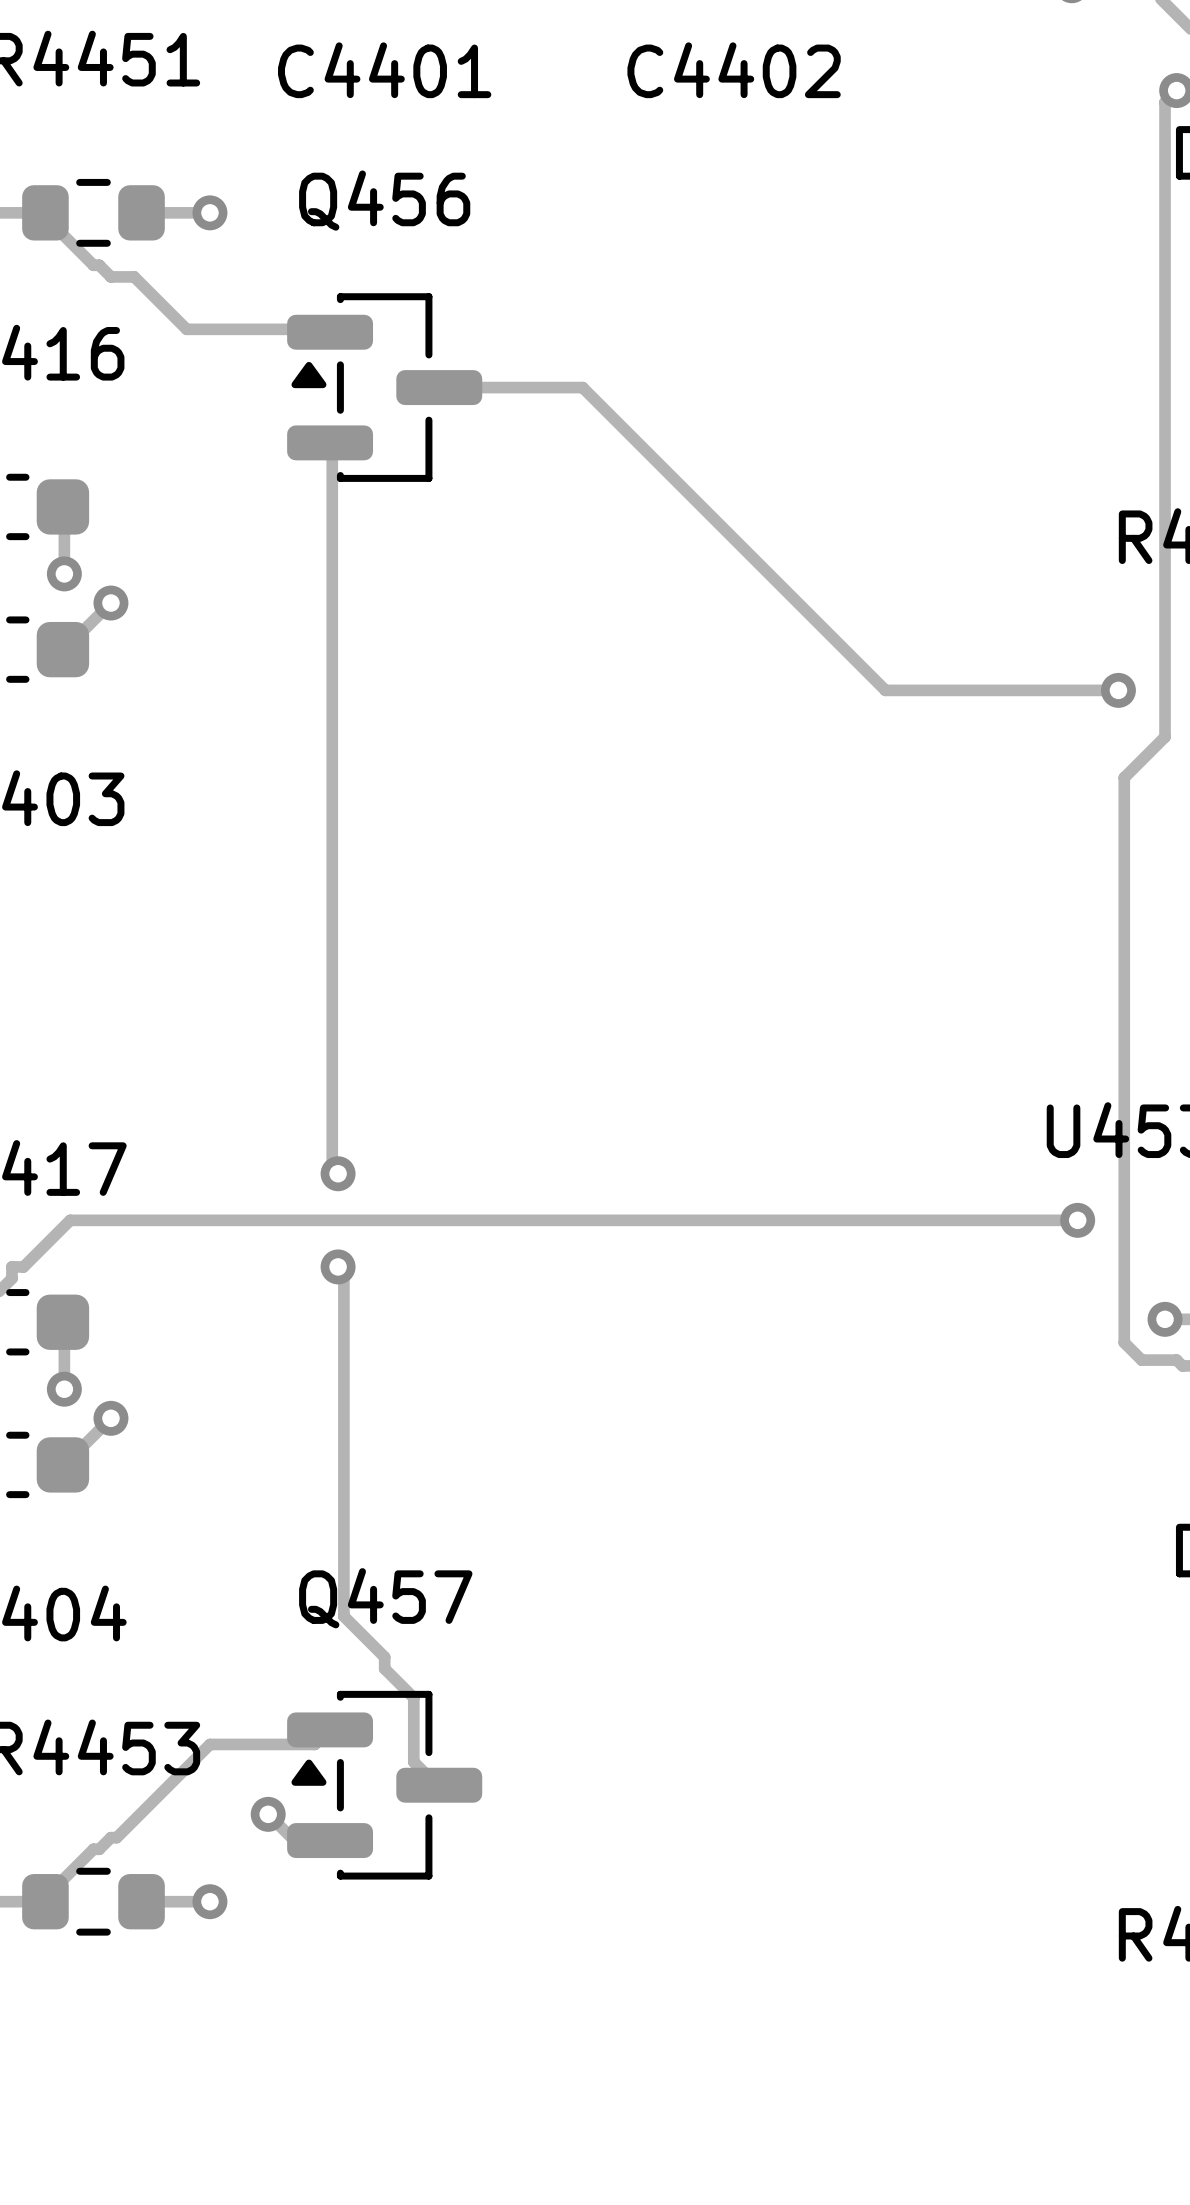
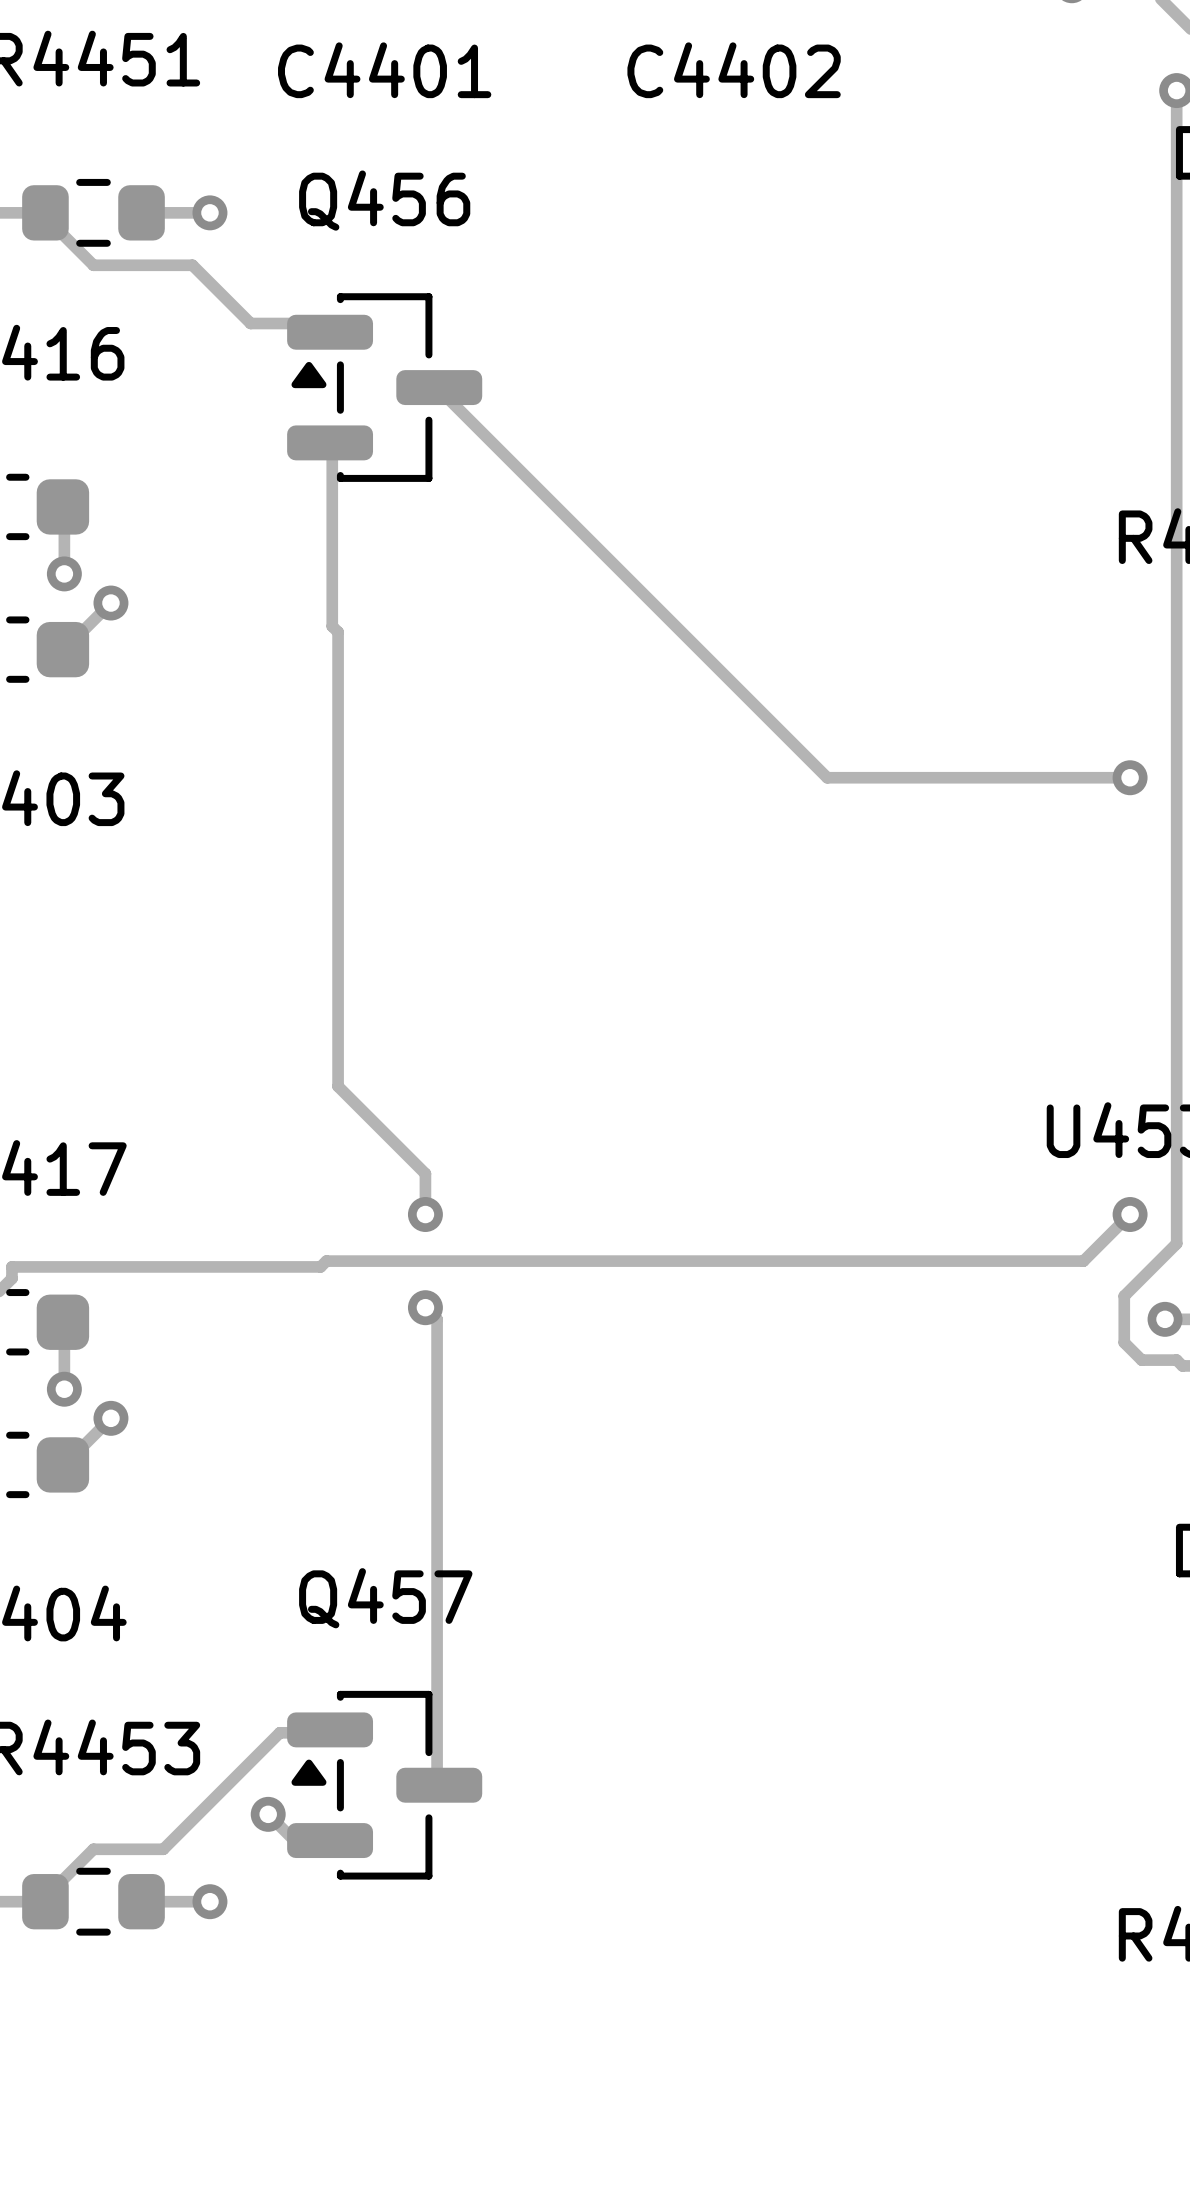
track: (1176, 90) (1165, 102) (1165, 736) (1124, 777) (1124, 1296) -> (1176, 90) (1176, 1243) (1124, 1296)
track: (99, 265) (110, 276) (134, 276) (186, 329) (332, 329) -> (99, 265) (192, 265) (250, 323) (326, 323) (332, 329)
track: (439, 387) (582, 387) (885, 690) (1118, 690) -> (437, 387) (827, 777) (1130, 777)
track: (332, 626) (332, 1167) (338, 1173) -> (332, 626) (338, 632) (338, 1086) (425, 1173) (425, 1214)
via position: (1118, 690) -> (1130, 777)
via: (338, 1173) -> none
via: none -> (425, 1214)
track: (1077, 1220) (70, 1220) (23, 1266) -> (1130, 1214) (1083, 1261) (326, 1261) (320, 1266) (23, 1266)
via position: (1077, 1220) -> (1130, 1214)
track: (338, 1266) (343, 1272) (343, 1616) (384, 1657) (384, 1668) (413, 1697) (413, 1761) (437, 1785) -> (425, 1307) (437, 1319) (437, 1785)
via: (338, 1266) -> none
via: none -> (425, 1307)
track: (326, 1732) (314, 1744) (209, 1744) (116, 1837) (110, 1837) (99, 1849) -> (326, 1732) (279, 1732) (163, 1849) (99, 1849)

